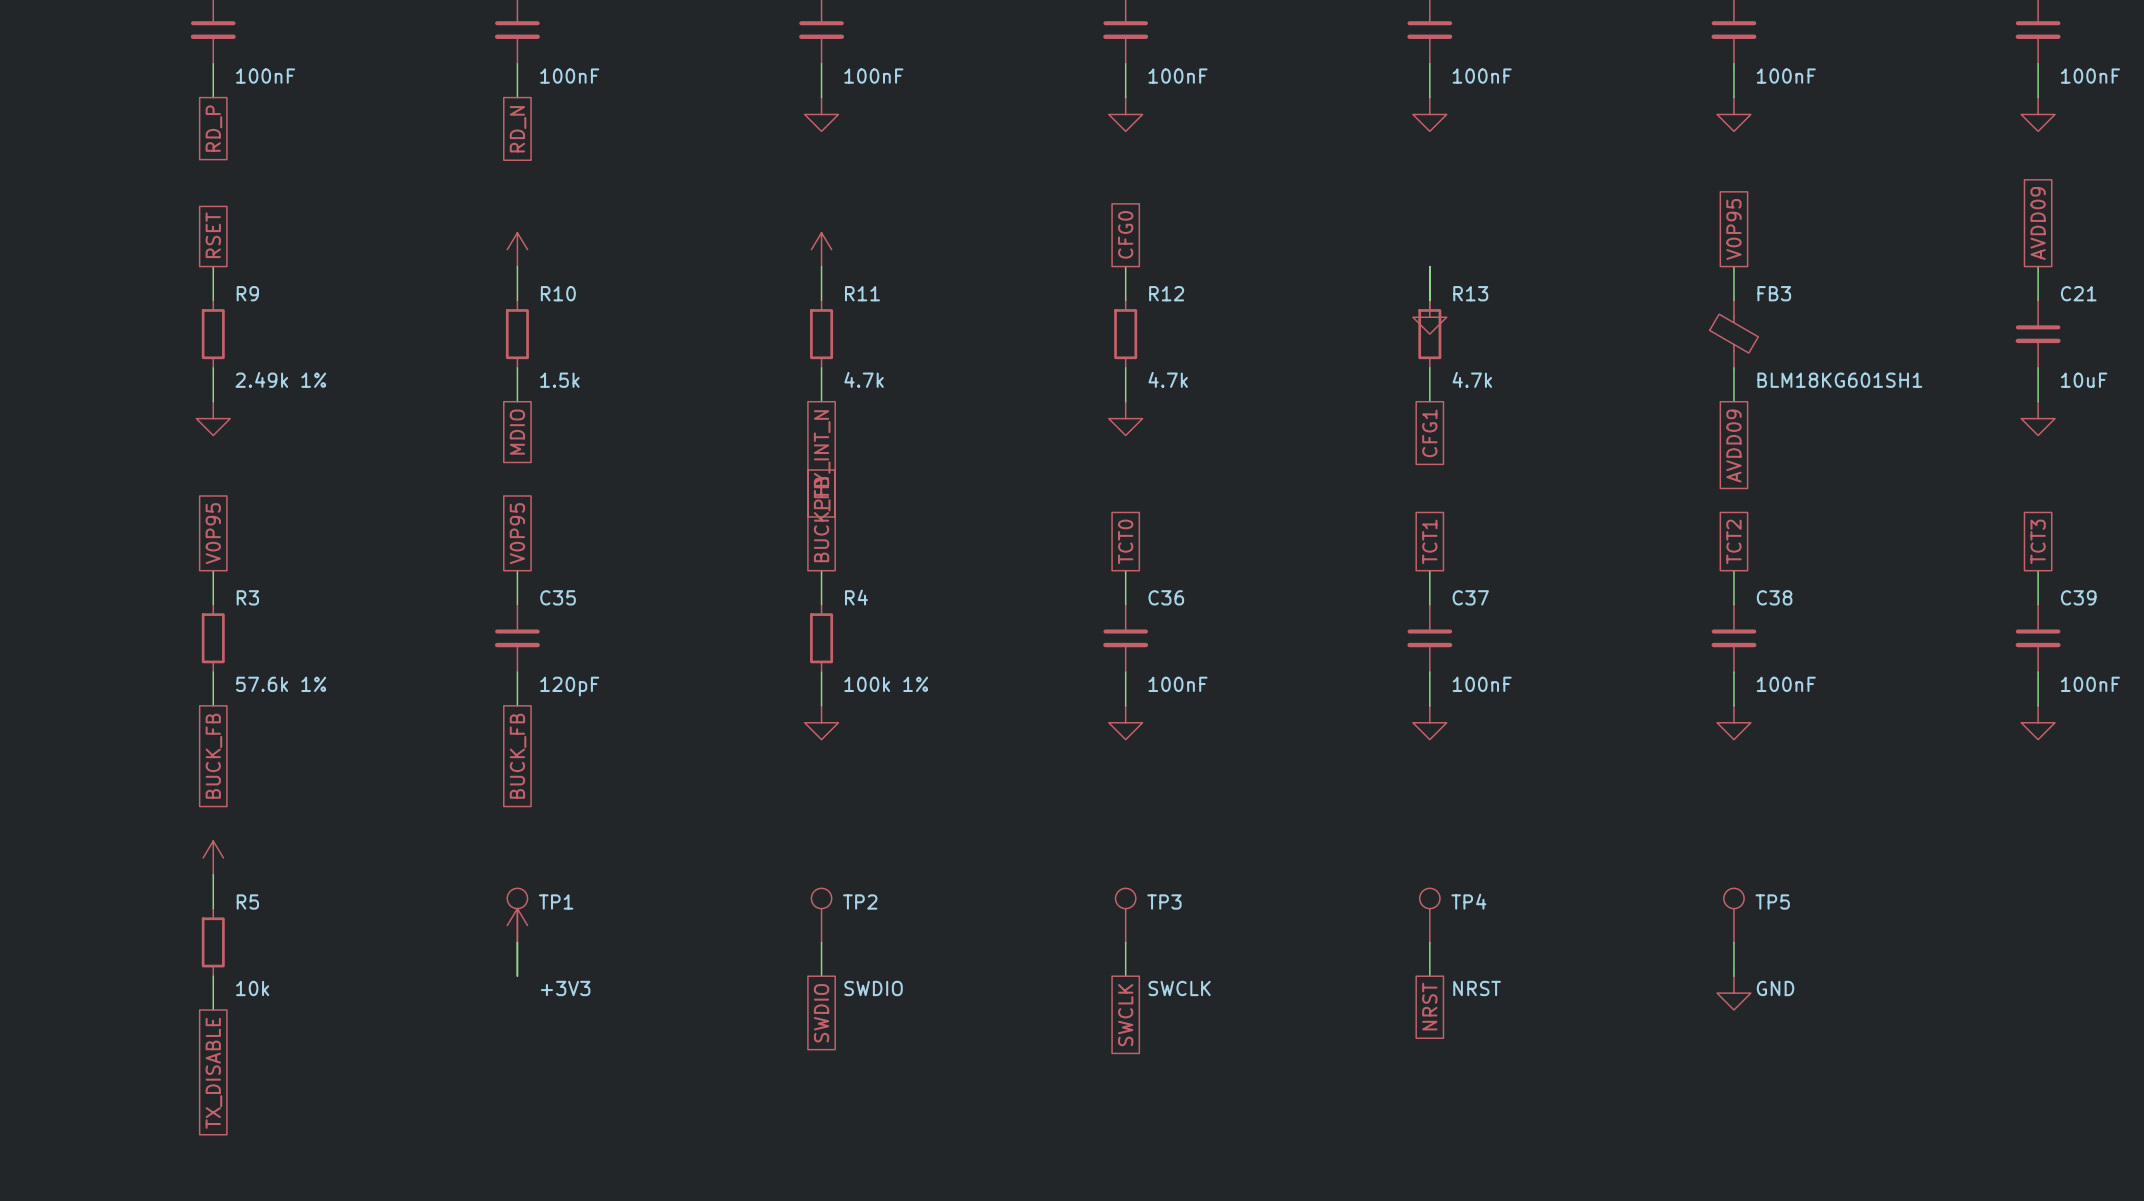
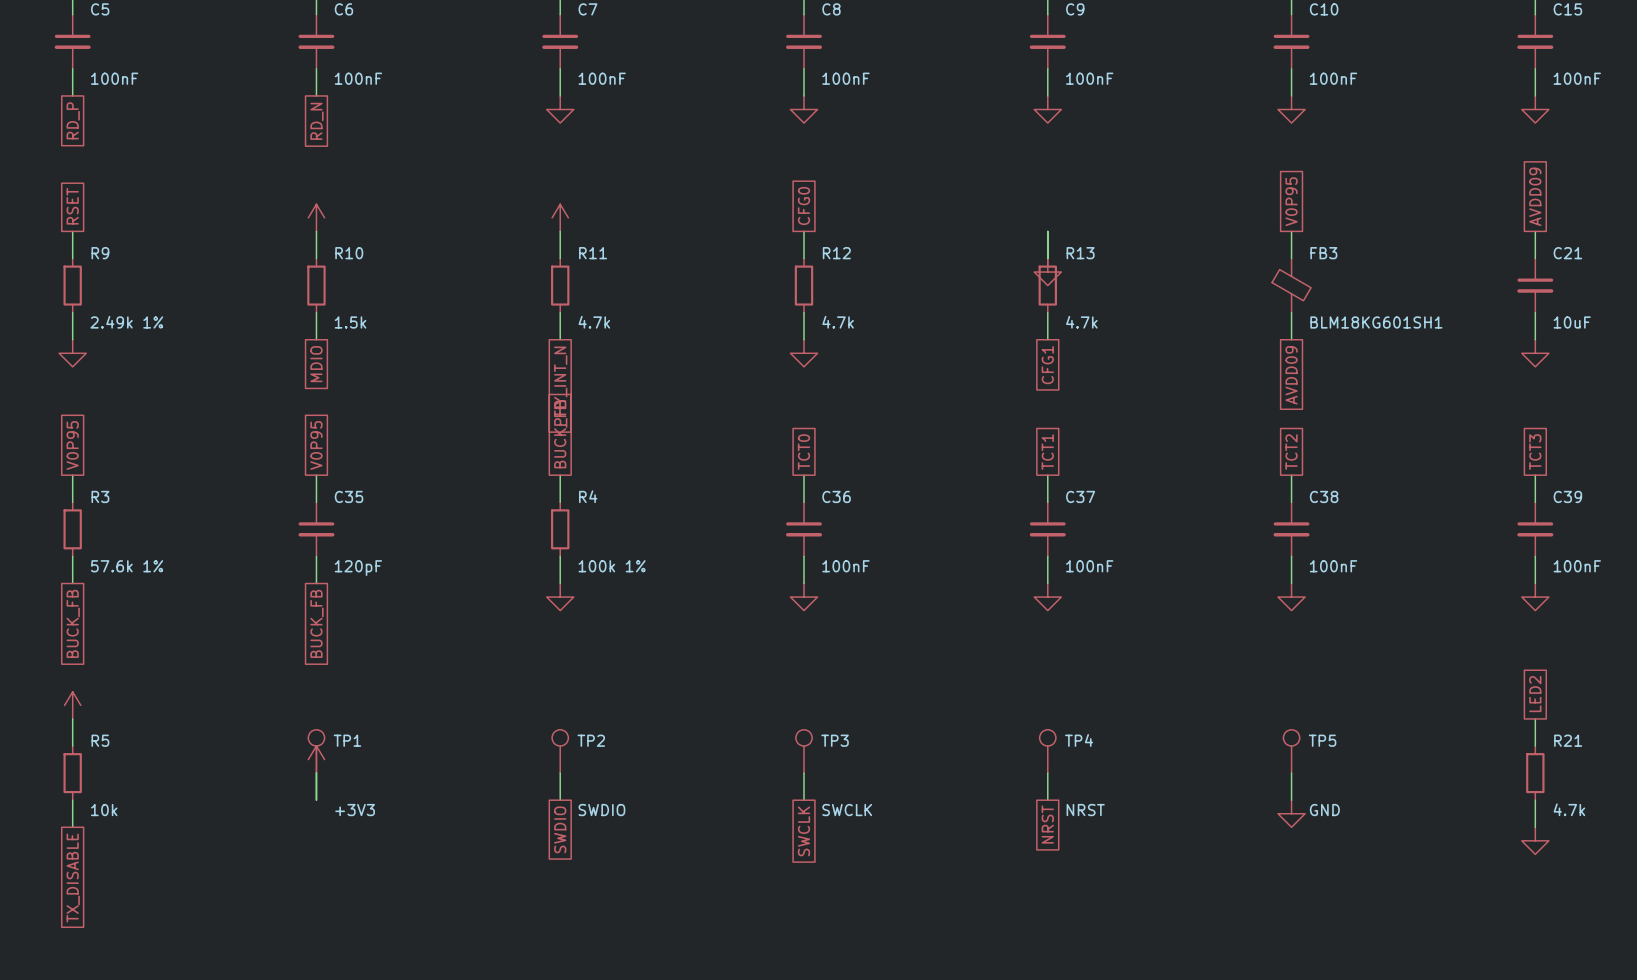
global label: none -> LED2 (1535, 694)
wire: none -> (1535, 718) (1535, 746)
R21: none -> 4.7k (1535, 773)
wire: none -> (1535, 800) (1535, 827)
power symbol: none -> (1535, 840)

